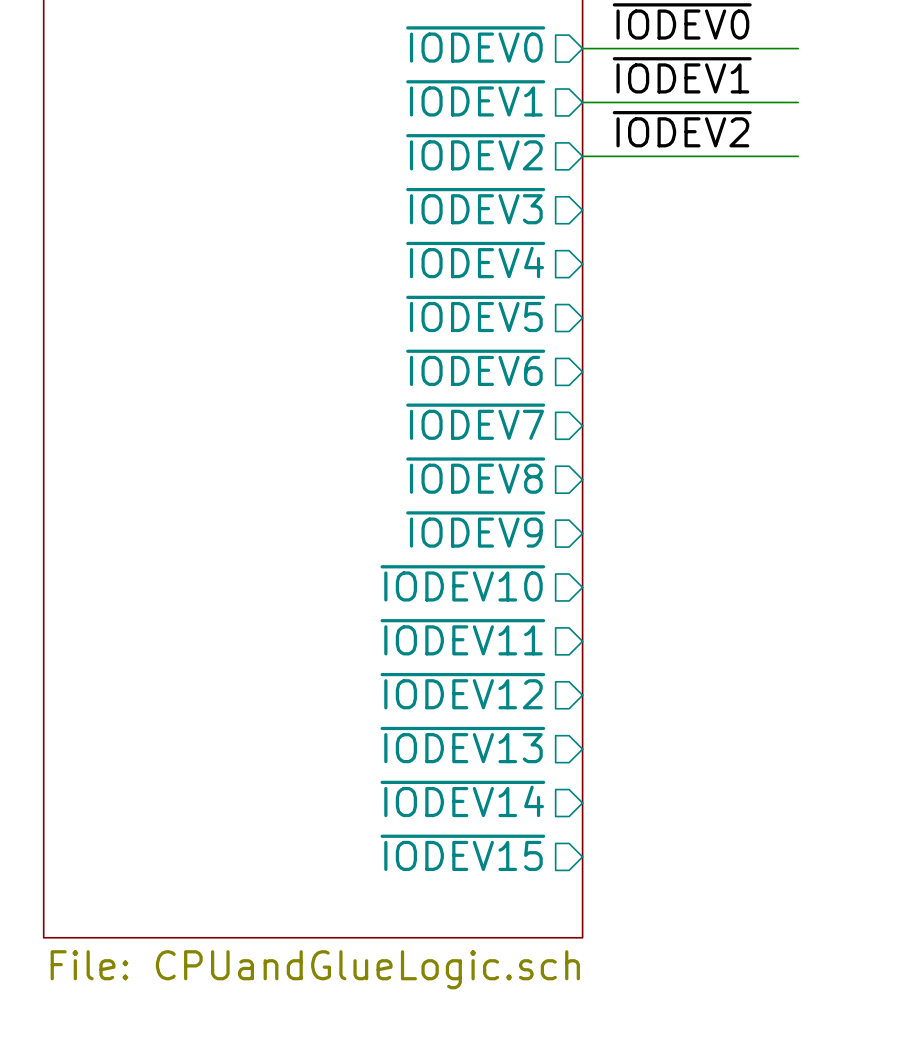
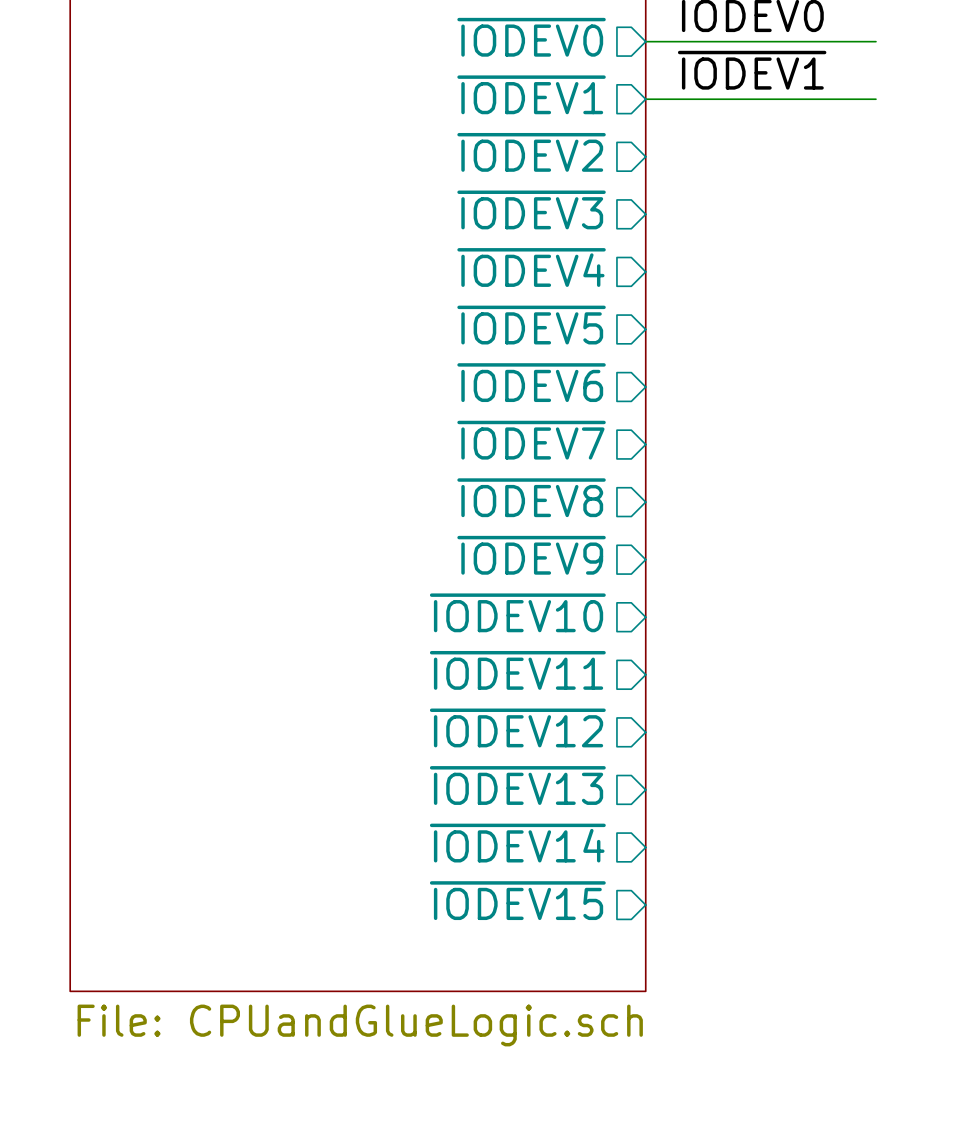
label: ~{IODEV2} (682, 129) -> none
wire: (582, 156) (798, 156) -> none

